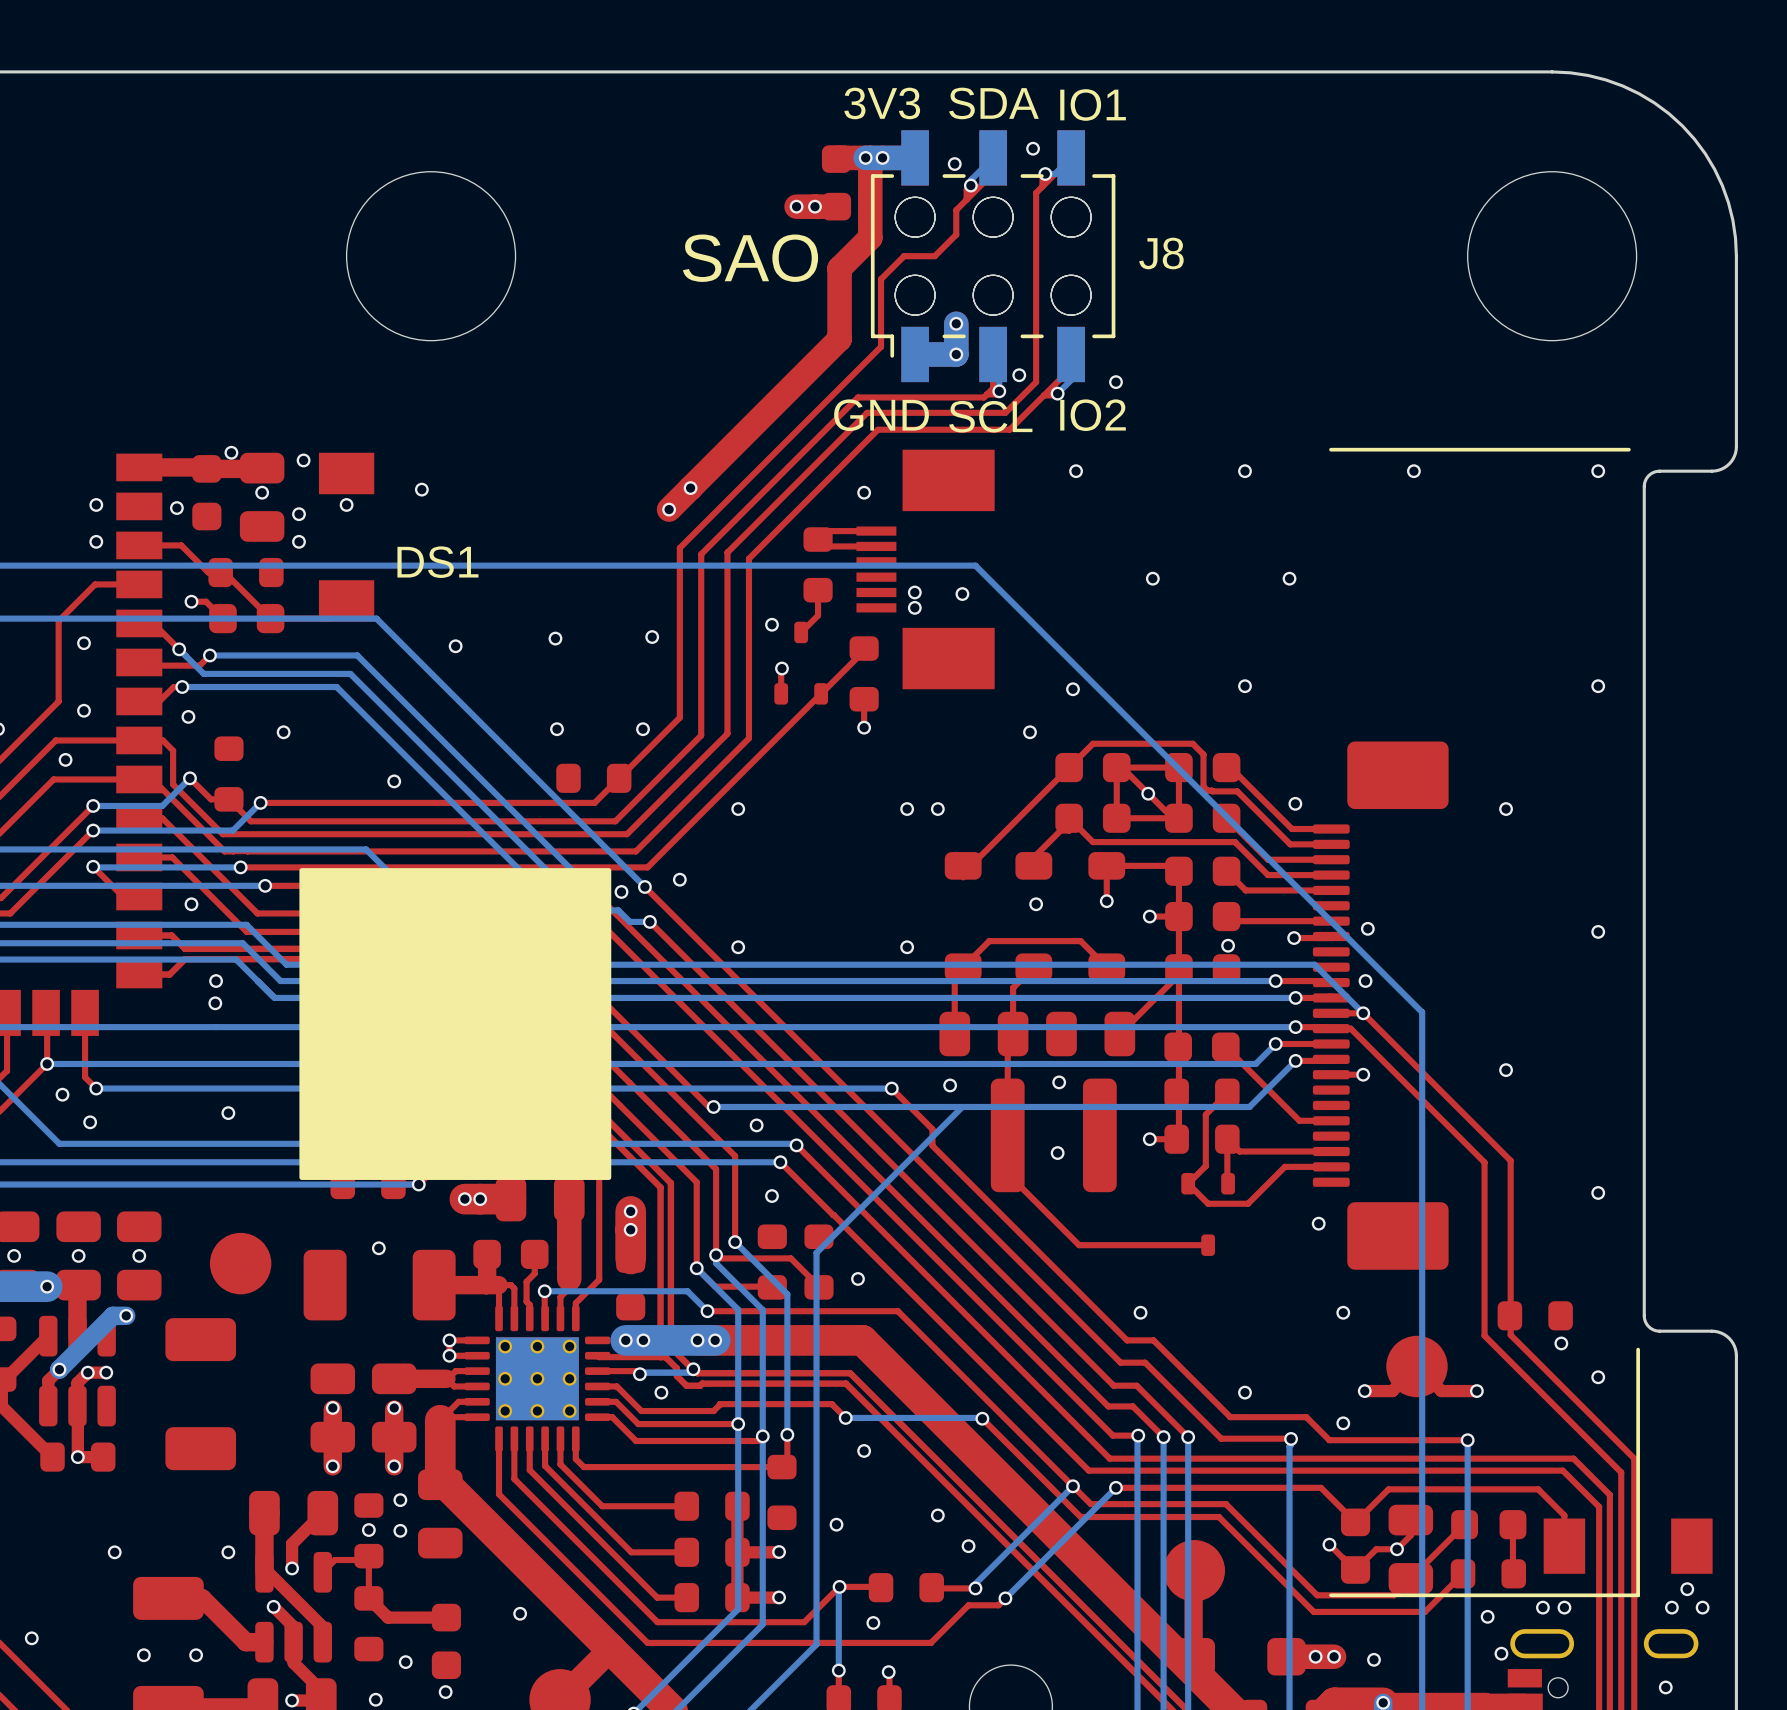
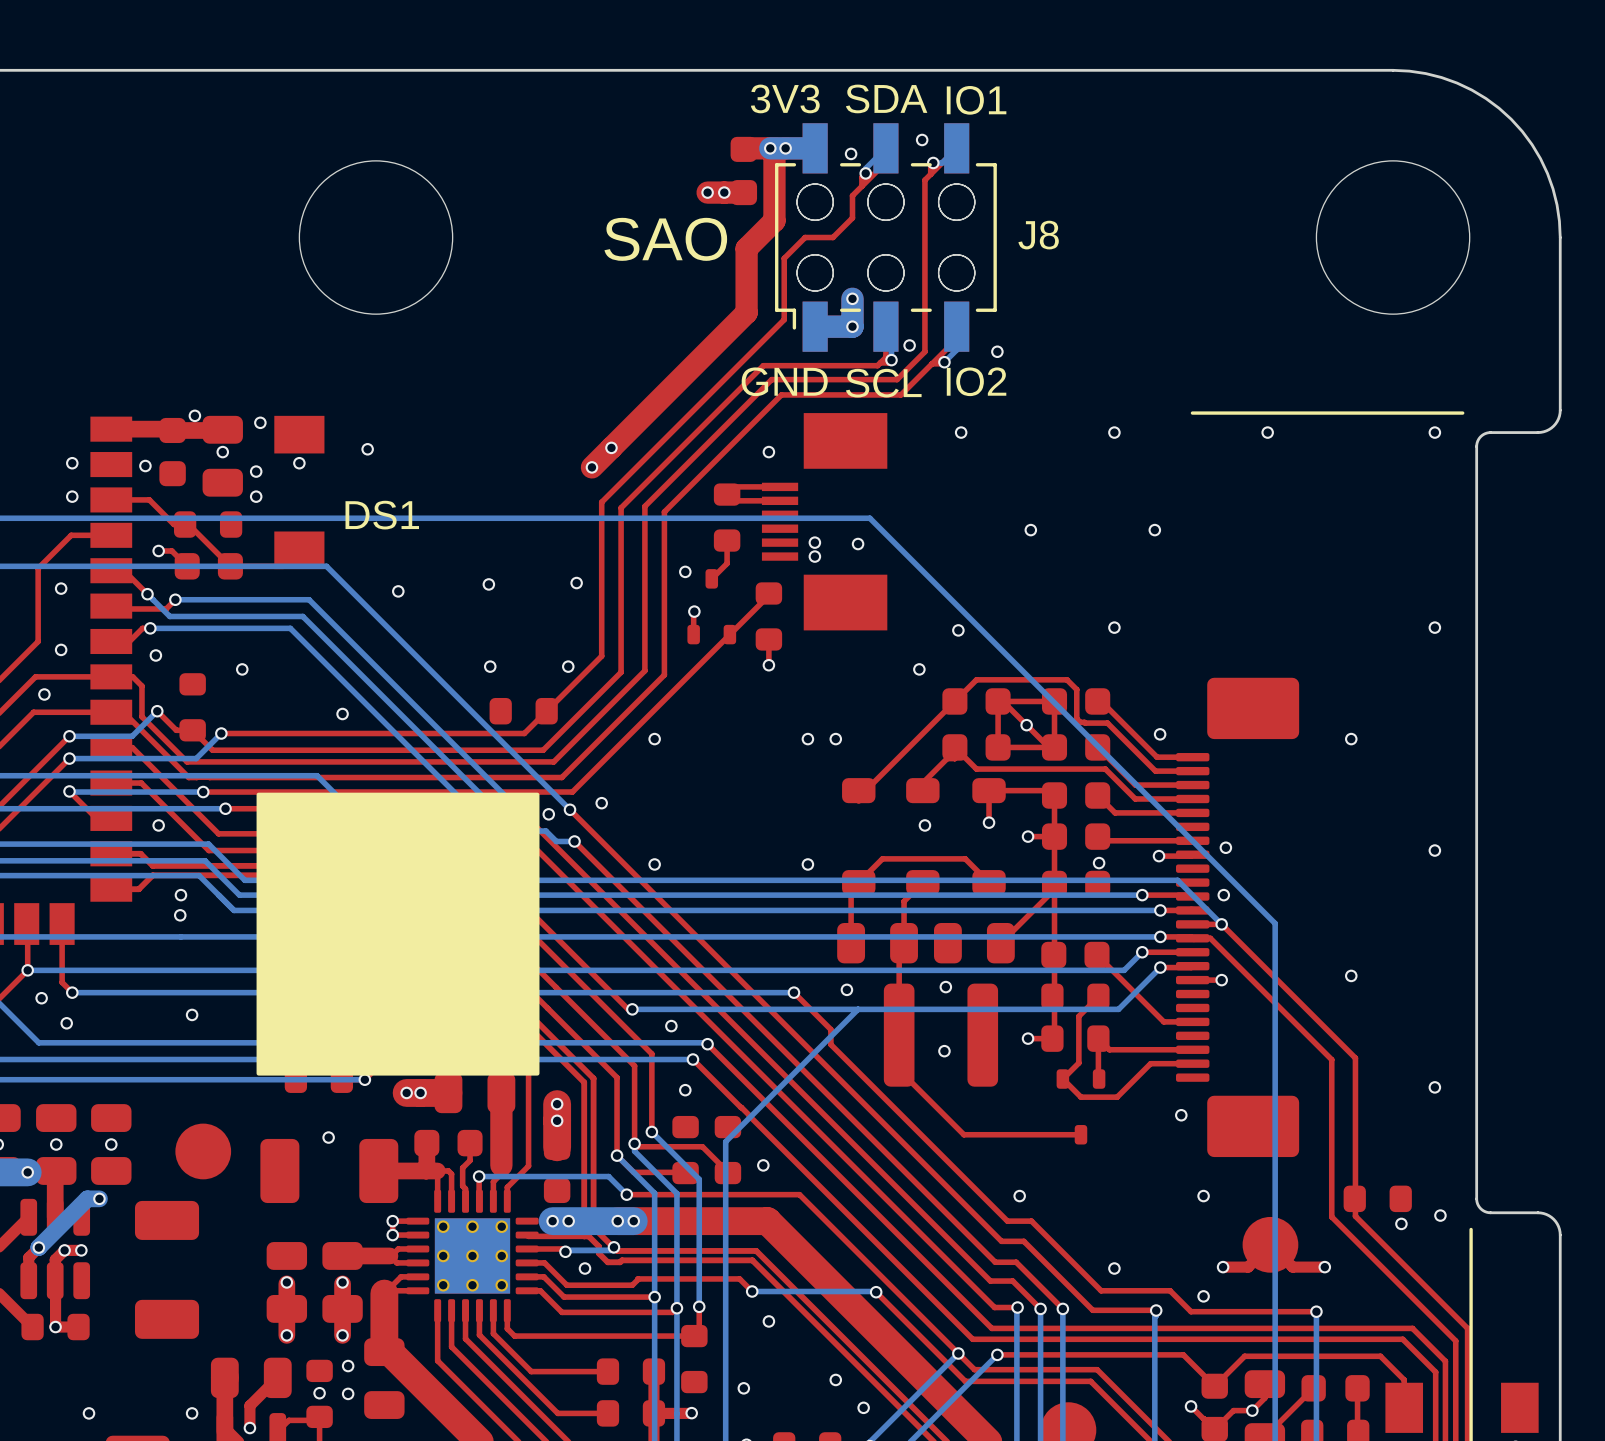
via position: (1598, 1377) -> (1440, 1215)

